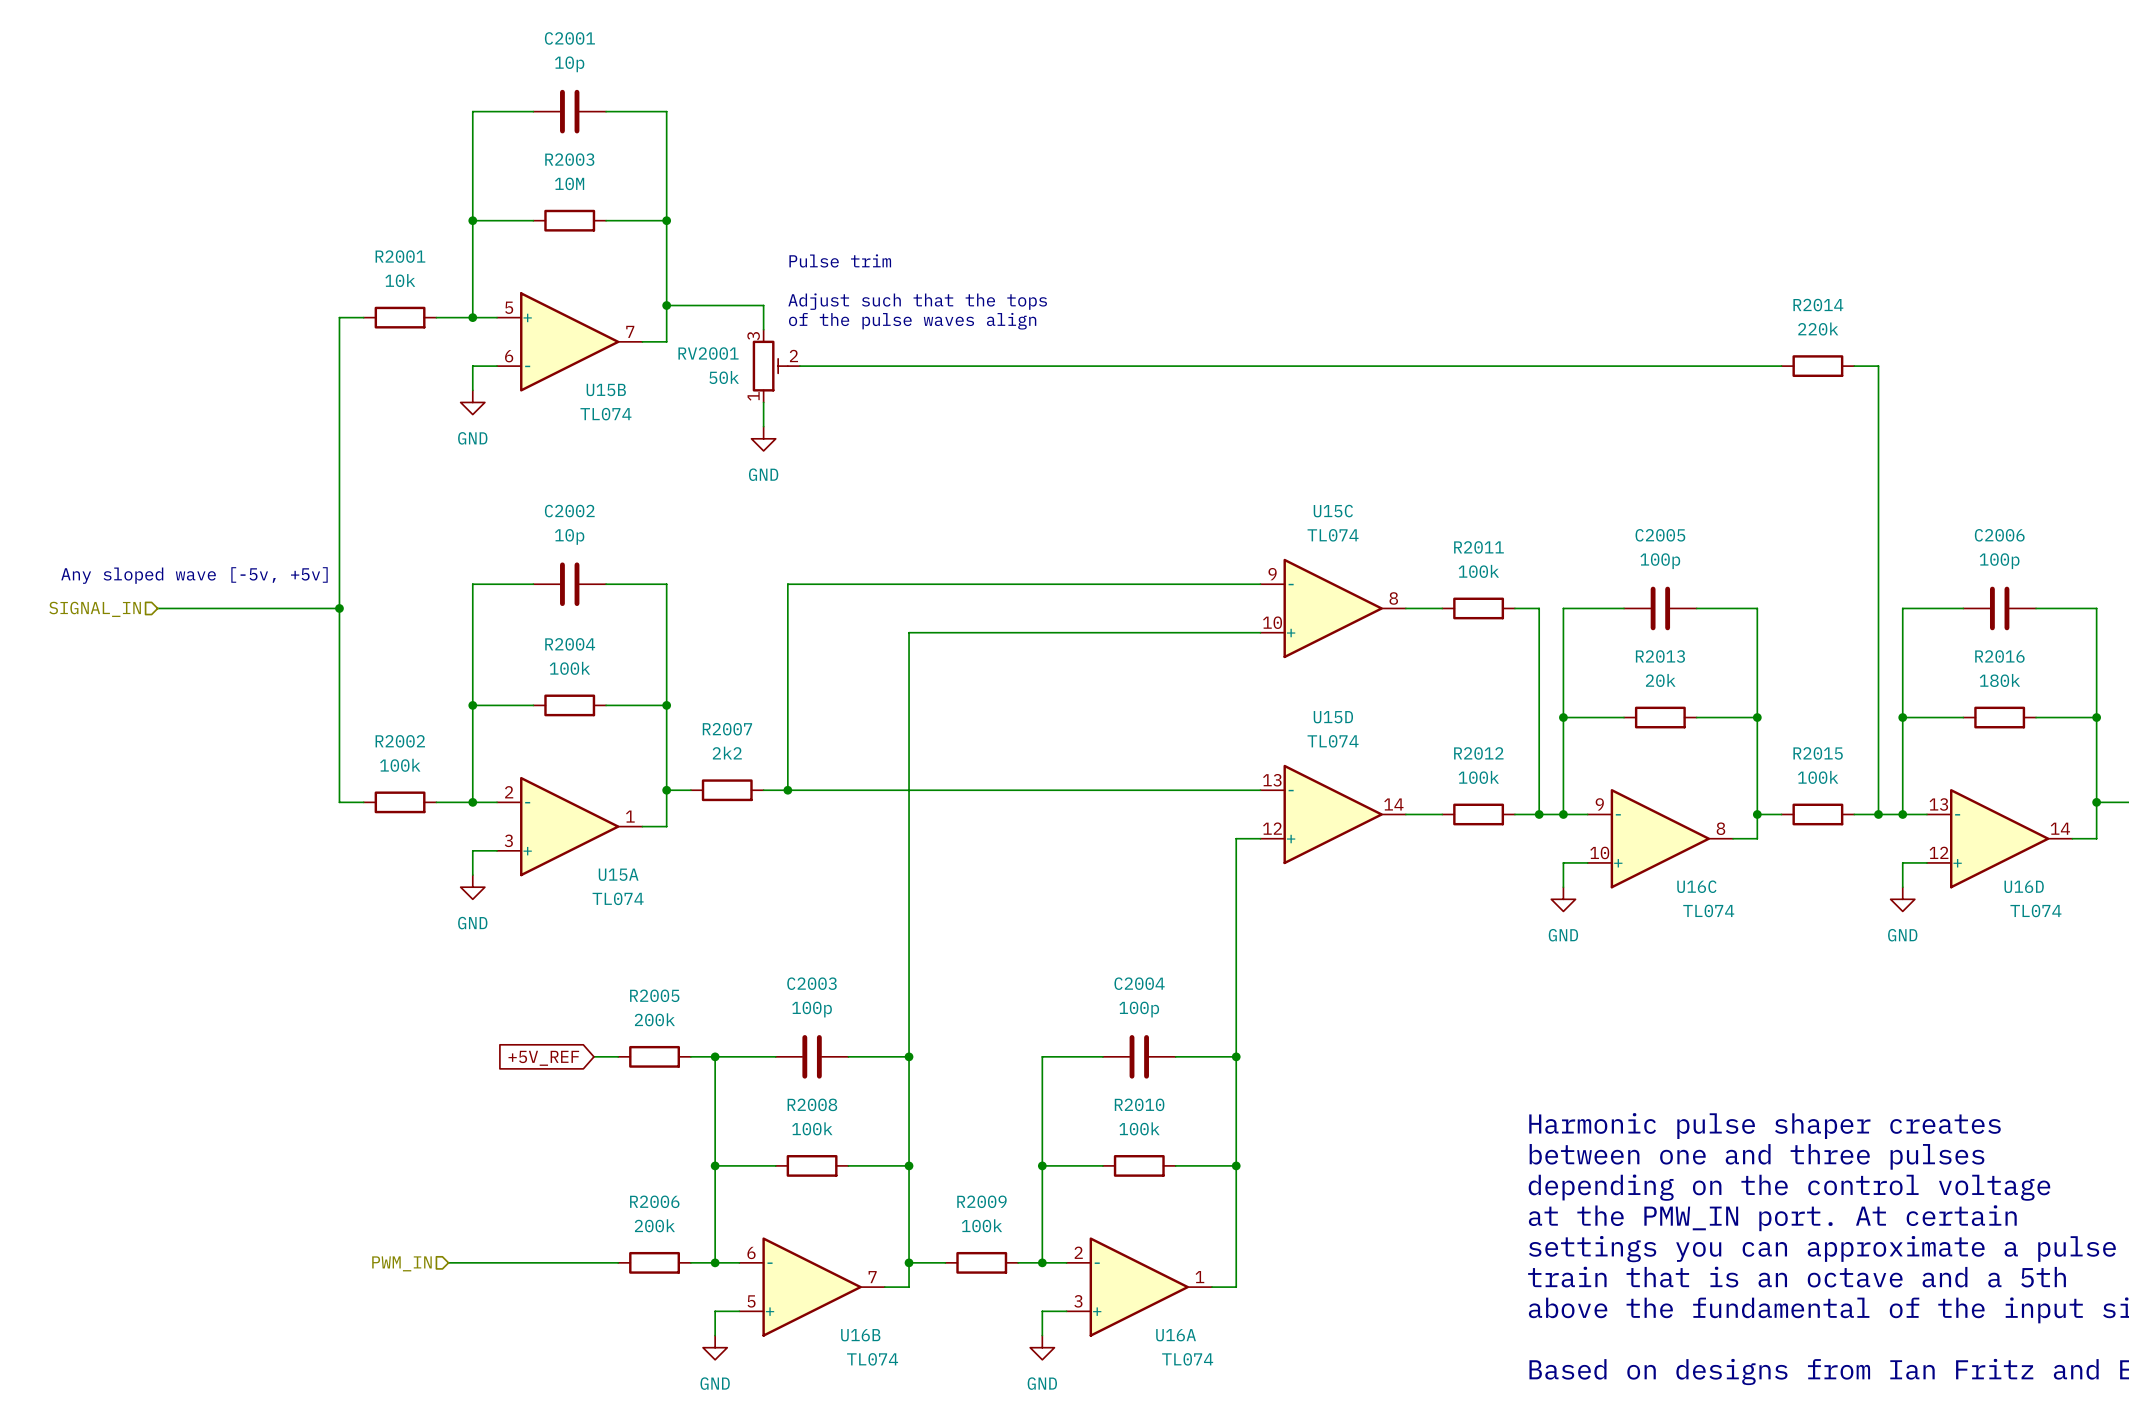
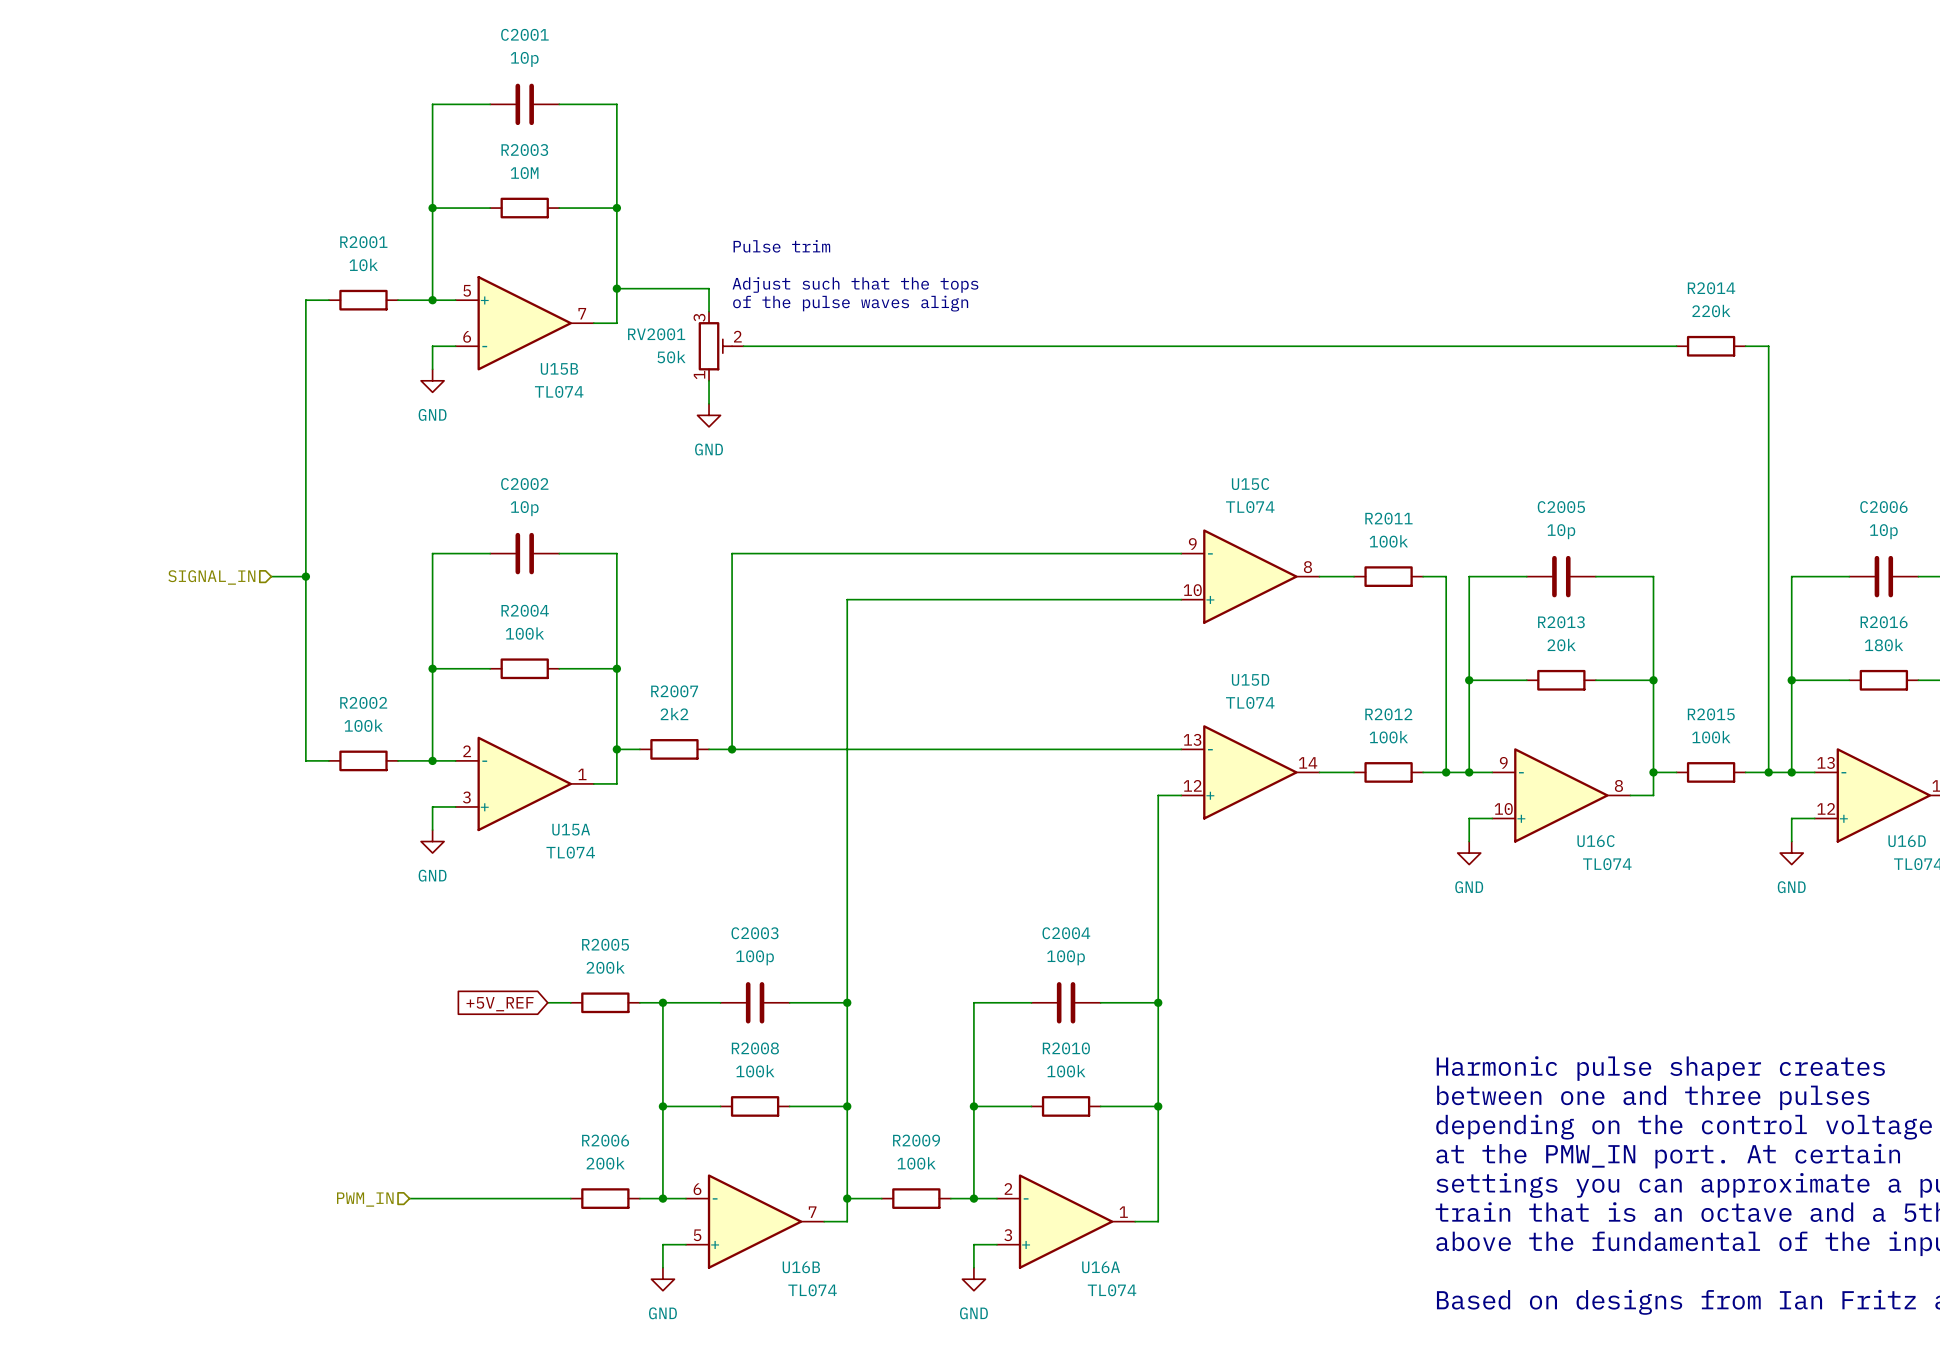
C2005 value: 100p (1660, 561) -> 10p (1561, 531)
C2006 value: 100p (1999, 561) -> 10p (1883, 531)
text: Any sloped wave [-5v, +5v] (194, 575) -> none
wire: (157, 608) (303, 608) -> none
hierarchical label position: SIGNAL_IN (95, 609) -> SIGNAL_IN (211, 577)

